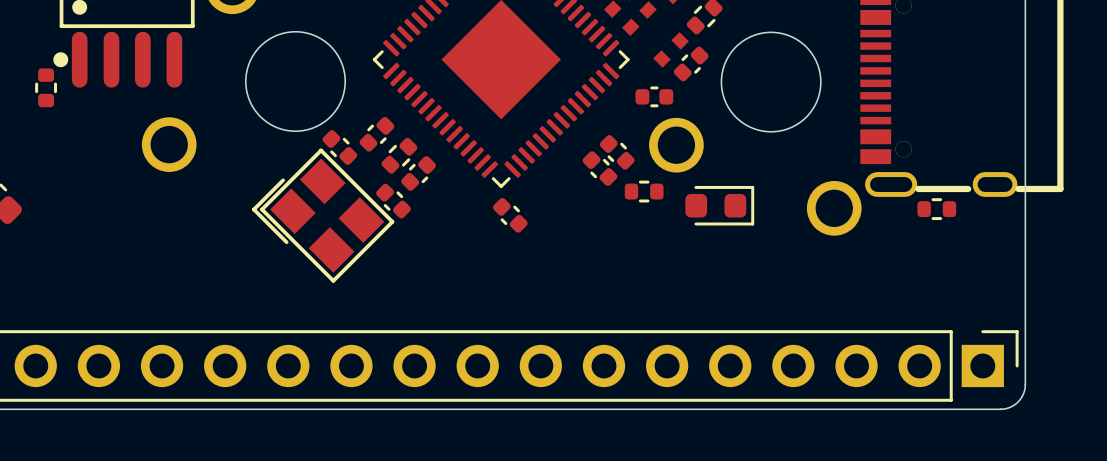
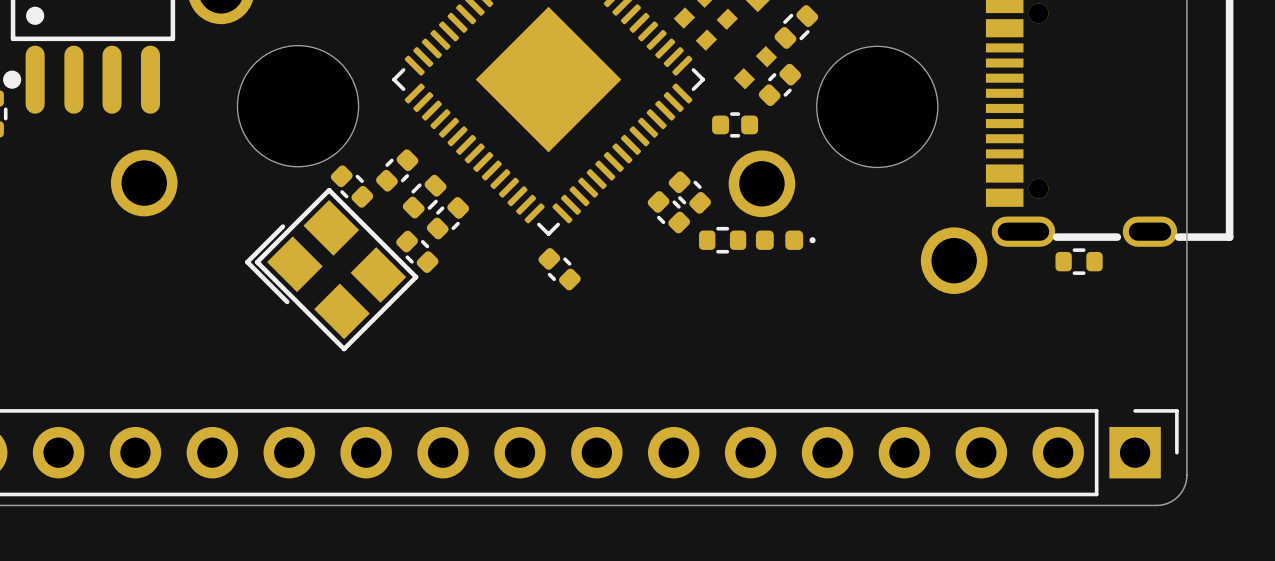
part: none -> (785, 240)
part: (719, 205) -> none

